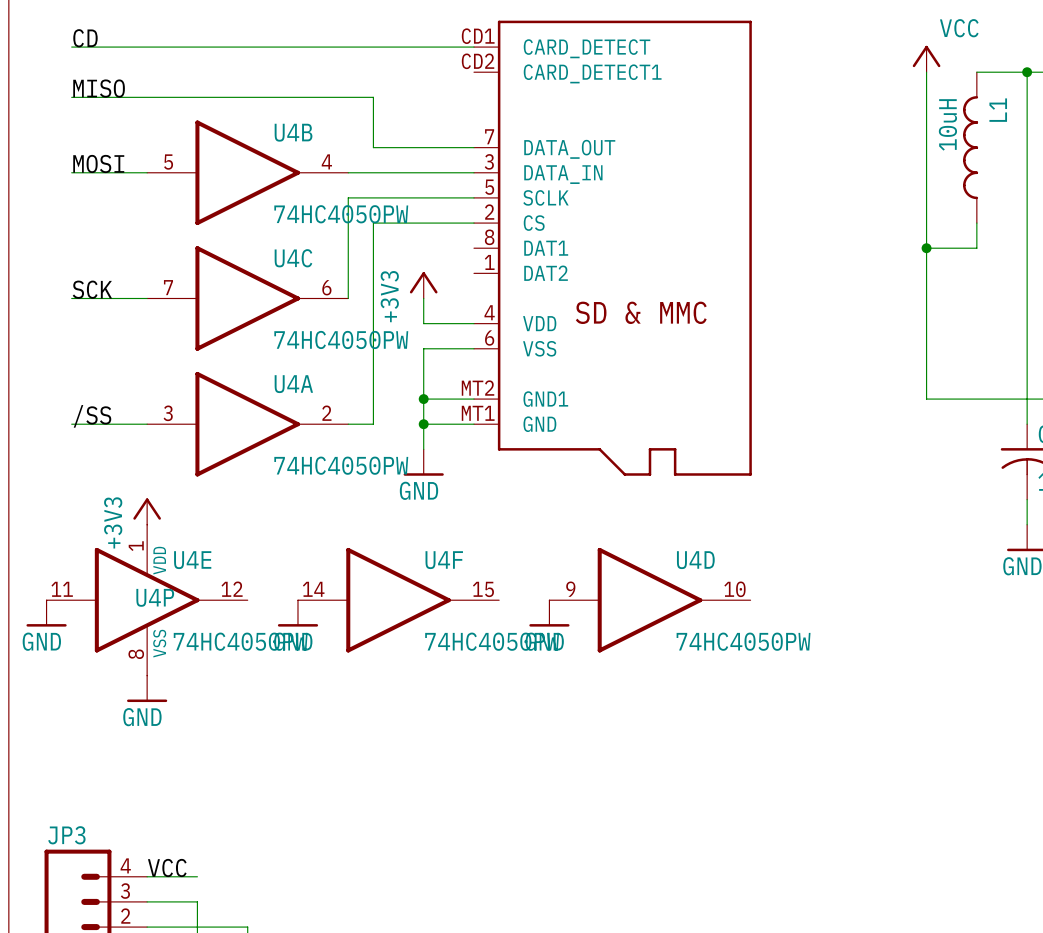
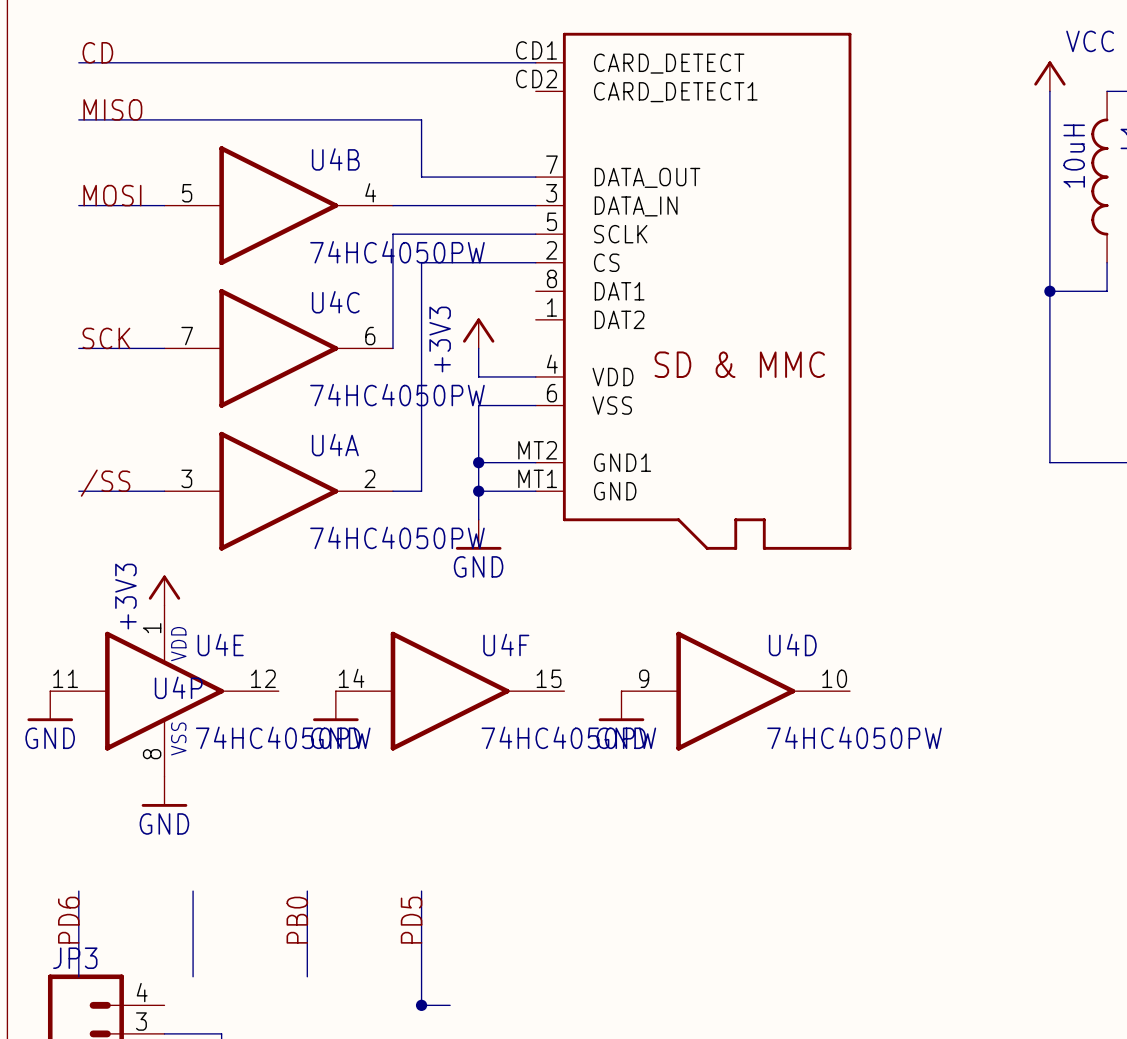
wire: none -> (78, 891) (78, 976)
wire: none -> (193, 891) (193, 976)
wire: none -> (307, 891) (307, 976)
wire: none -> (421, 891) (421, 1005) (450, 1005)
label: none -> PD6 (68, 920)
label: none -> PB0 (297, 920)
label: none -> PD5 (411, 920)
label: VCC (167, 867) -> none
wire: (147, 876) (197, 876) -> none
junction: none -> (421, 1005)

